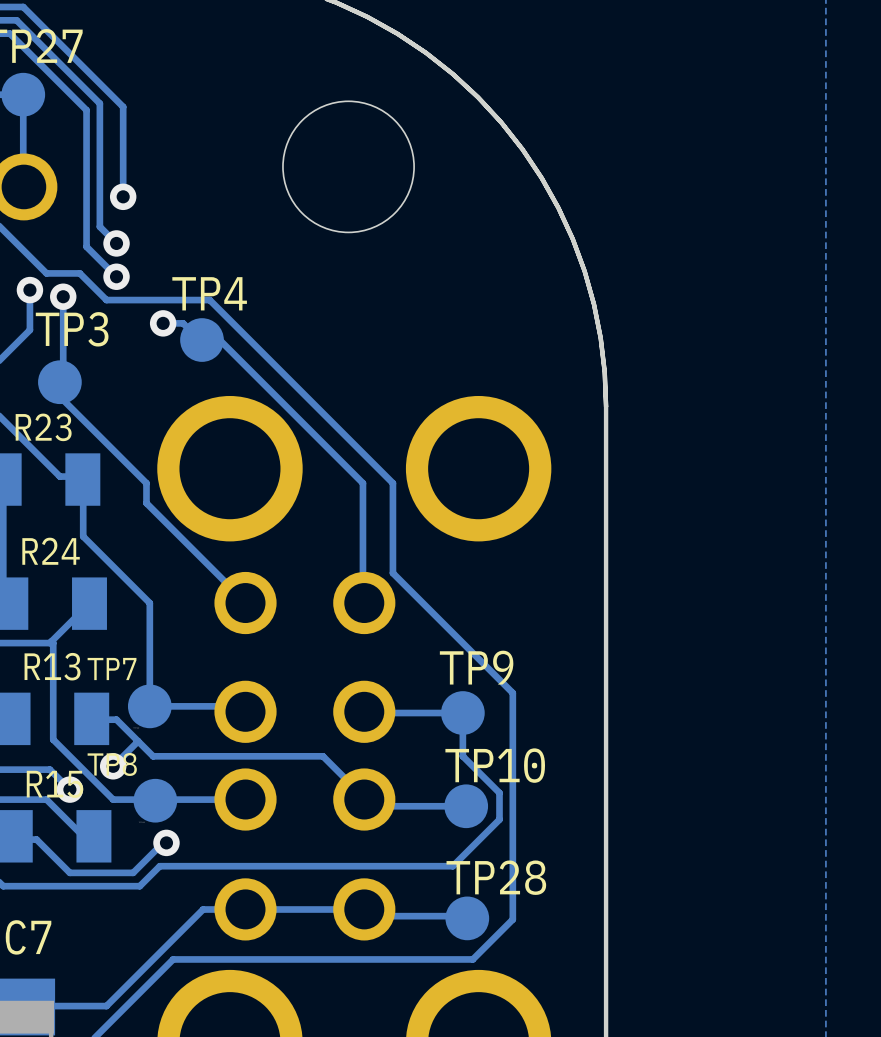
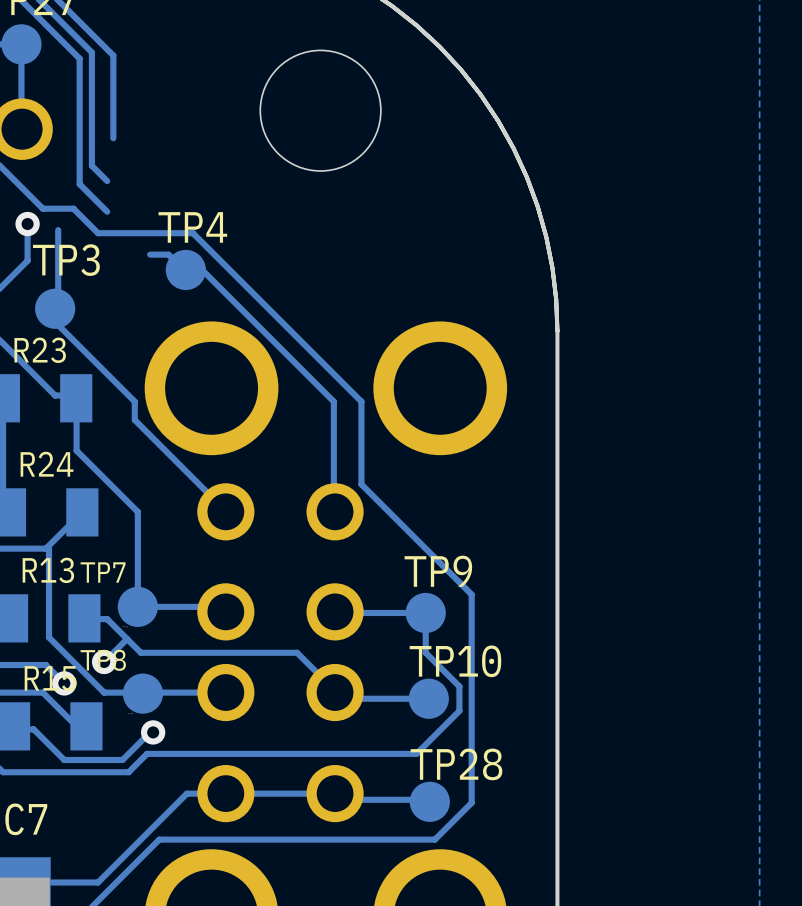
via: (123, 196) -> none
via: (116, 243) -> none
via: (116, 276) -> none
via: (63, 296) -> none
via: (163, 323) -> none

